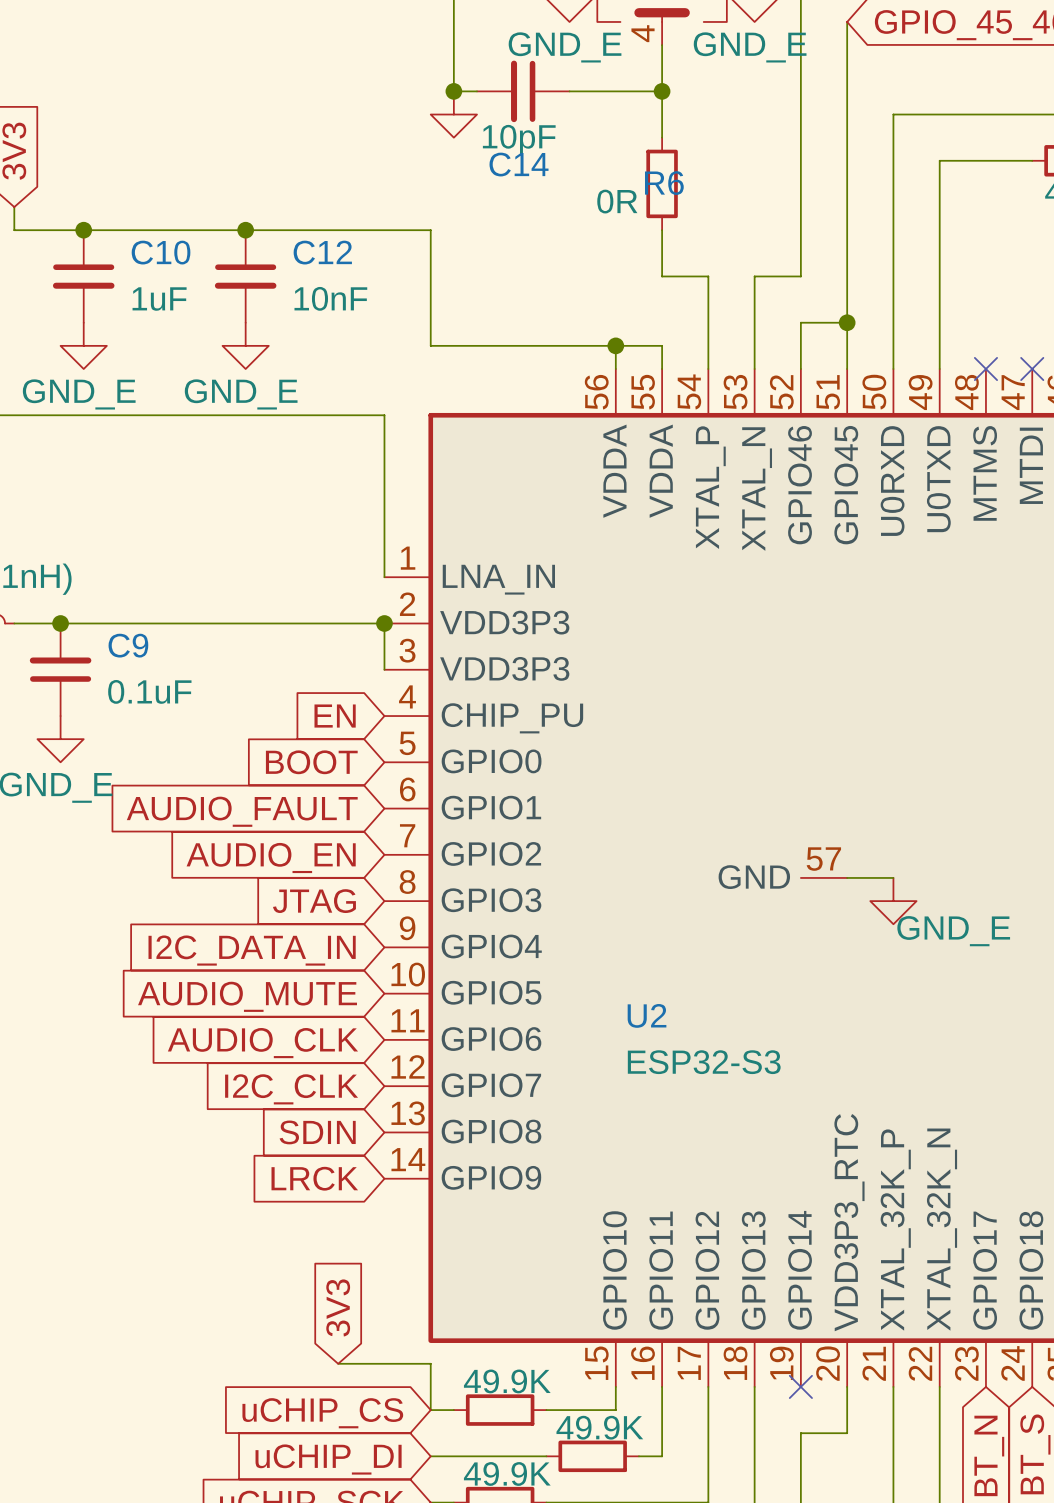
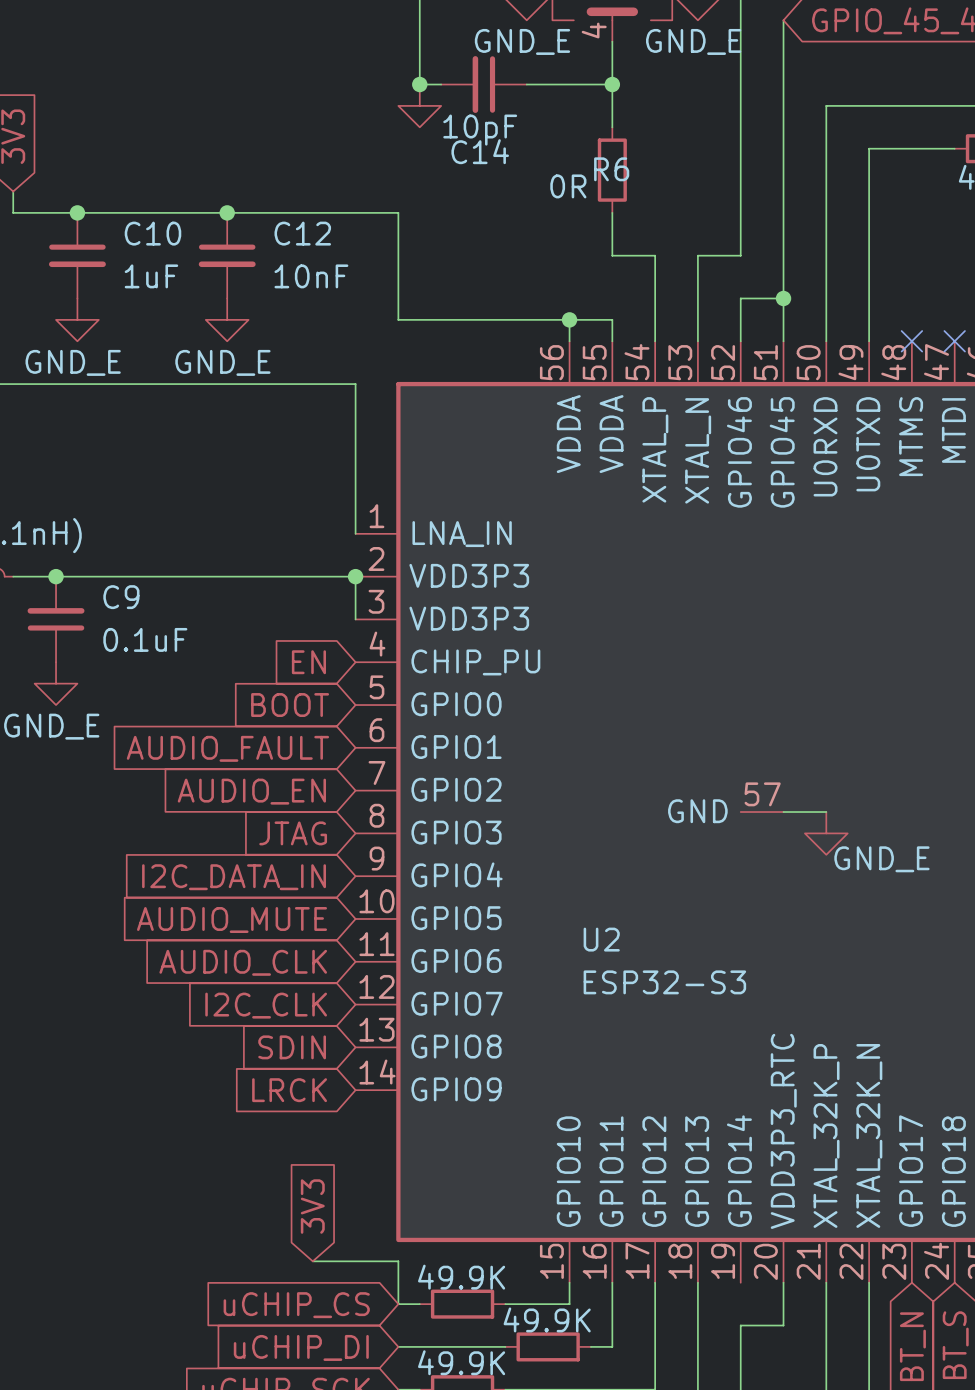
no-connect mark: (800, 1386) -> none

